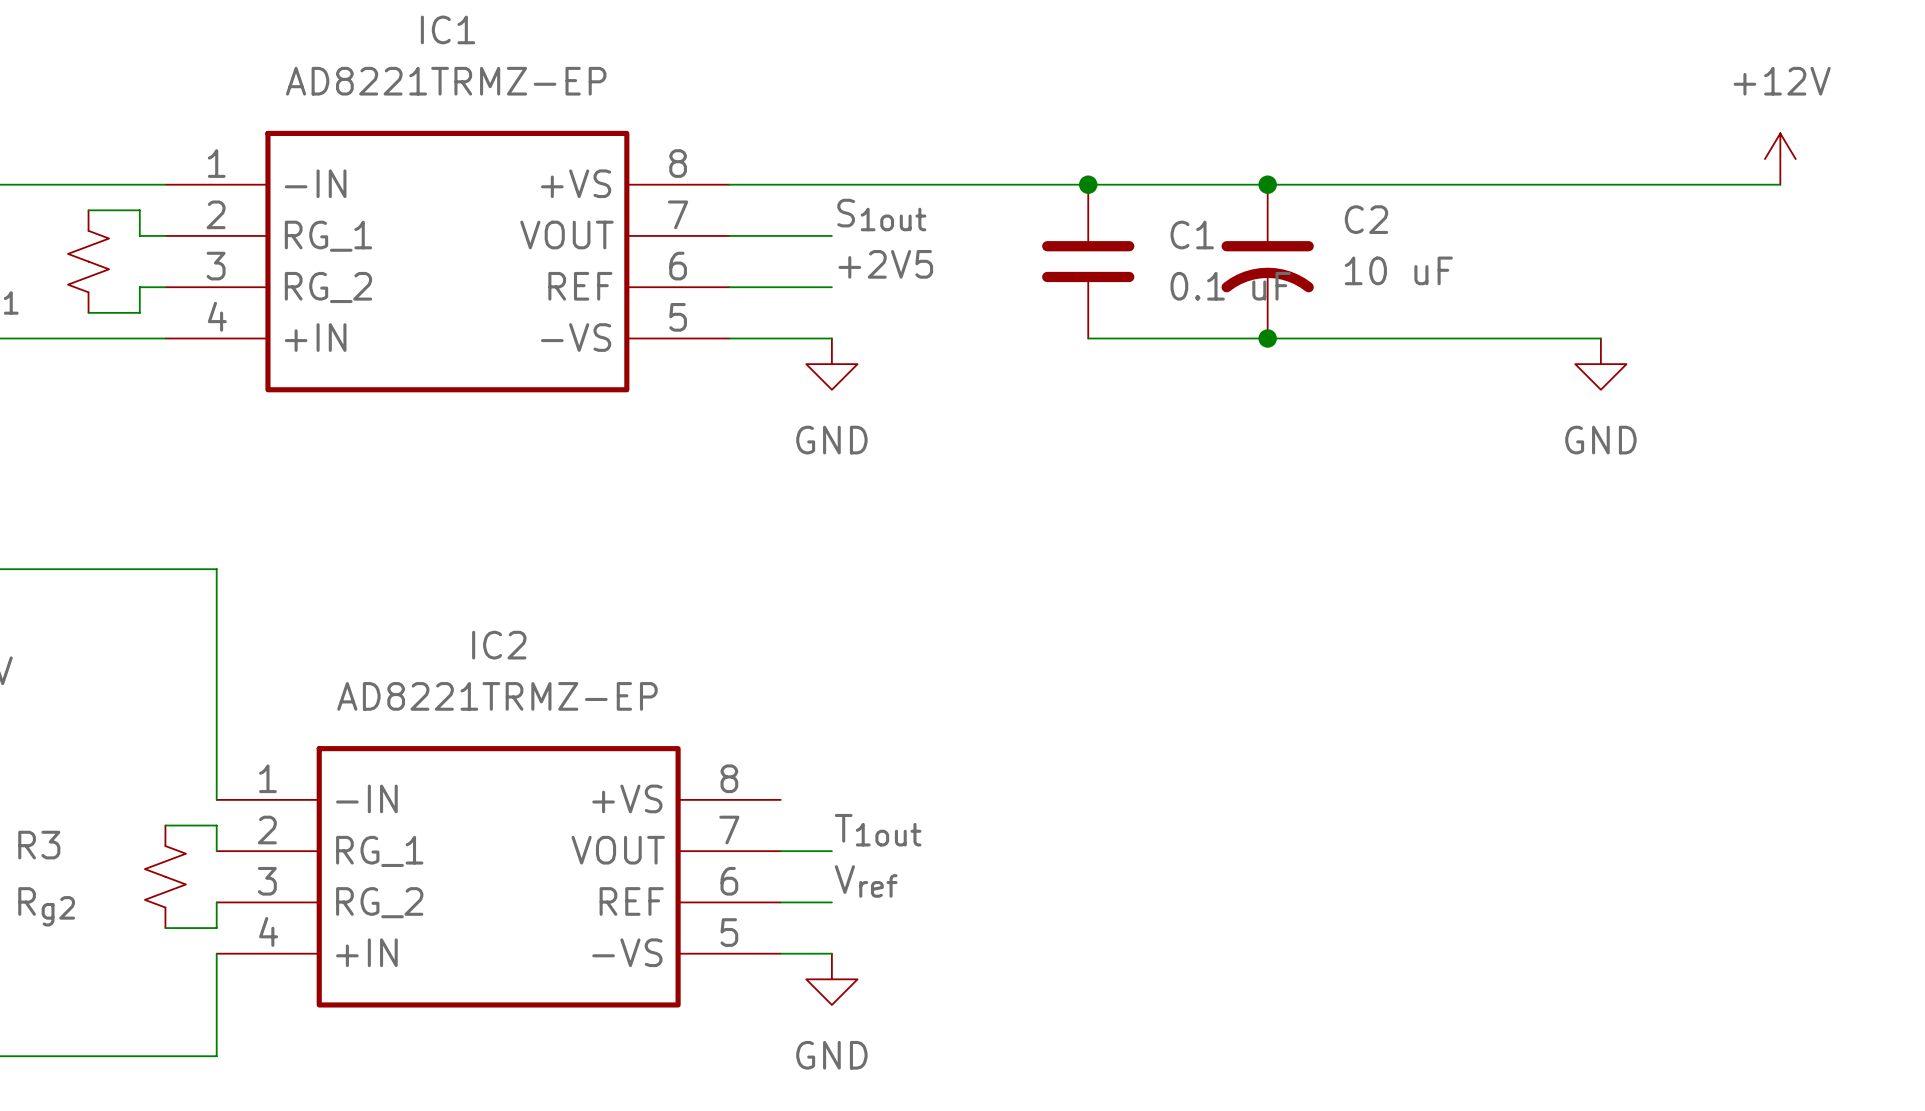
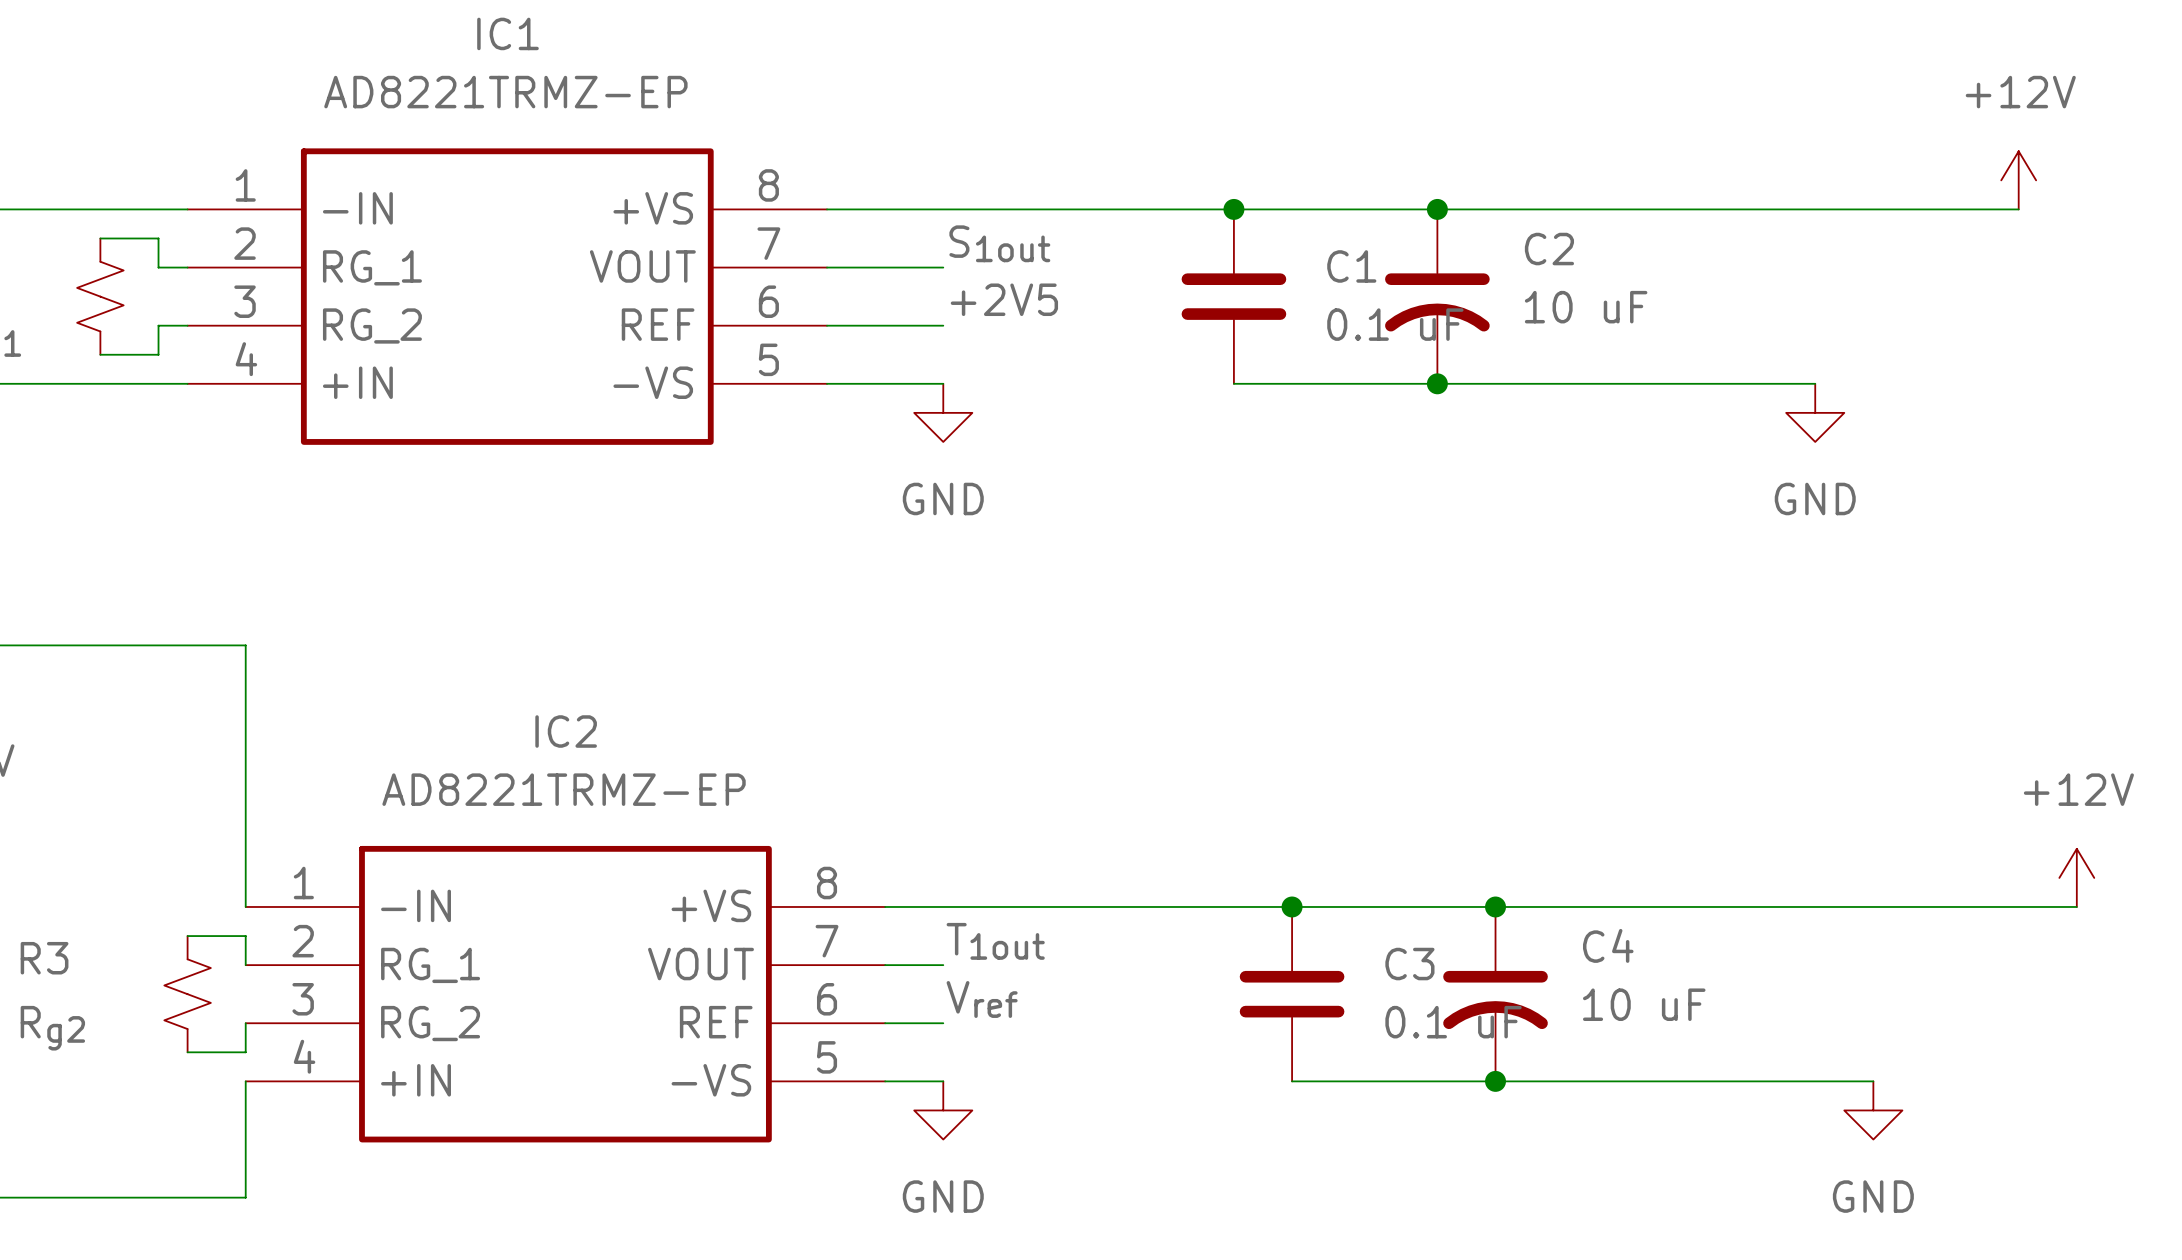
power symbol: none -> +12V (2076, 877)
wire: none -> (885, 906) (2076, 906)
junction: none -> (1292, 906)
junction: none -> (1495, 906)
C3: none -> 0.1 uF (1292, 994)
C4: none -> 10 uF (1495, 994)
wire: none -> (1292, 1081) (1873, 1081)
junction: none -> (1495, 1081)
power symbol: none -> GND (1873, 1110)

